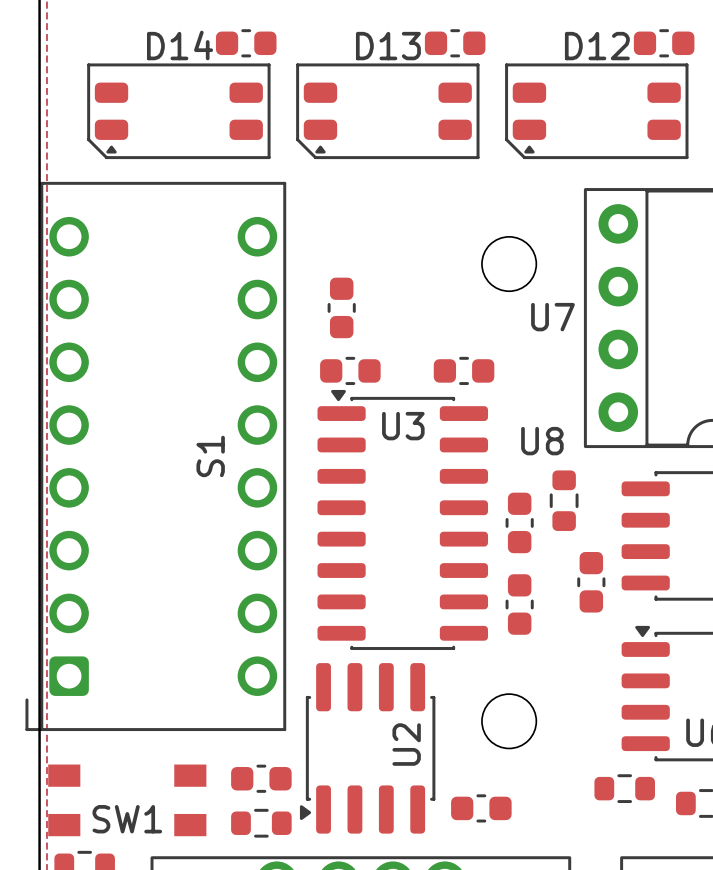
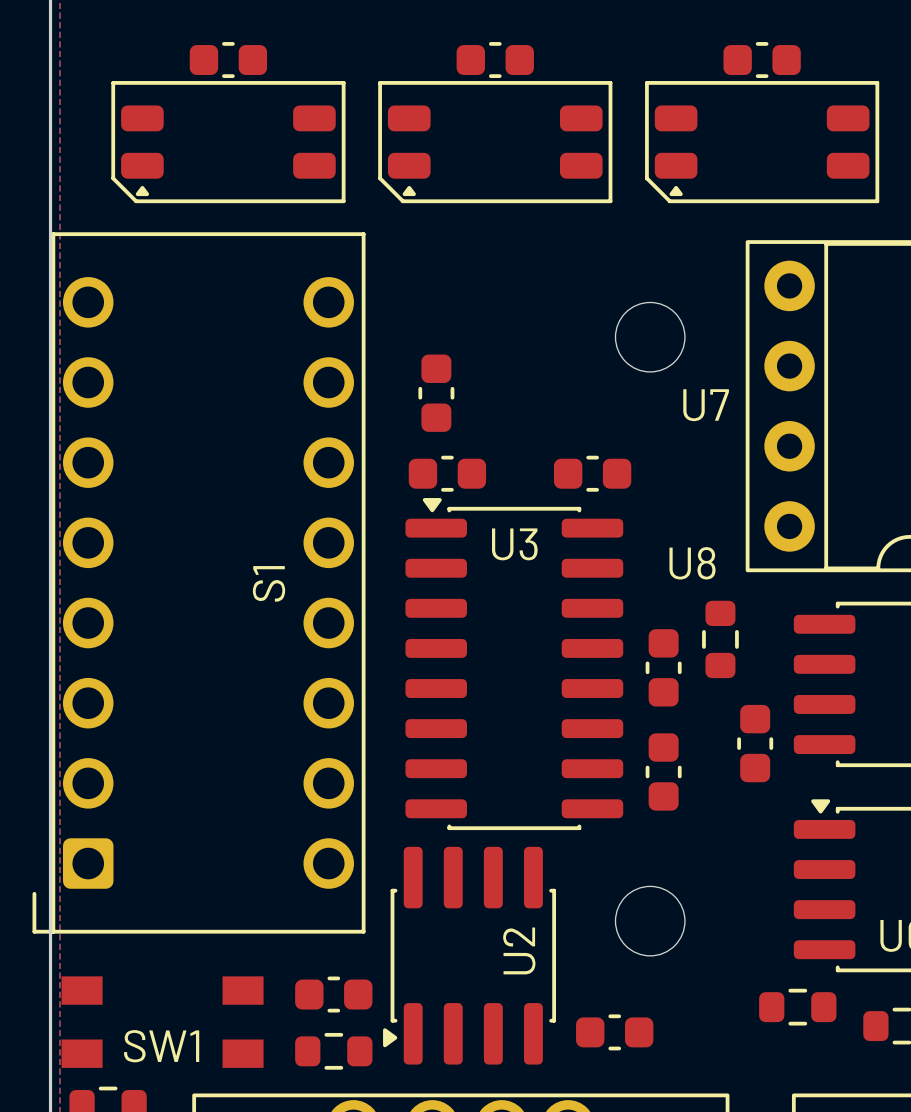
part position: (246, 43) -> (228, 60)
part position: (455, 43) -> (495, 60)
part position: (664, 43) -> (762, 60)
D14 name: D14 (180, 45) -> none
D13 name: D13 (388, 46) -> none
D12 name: D12 (597, 46) -> none

